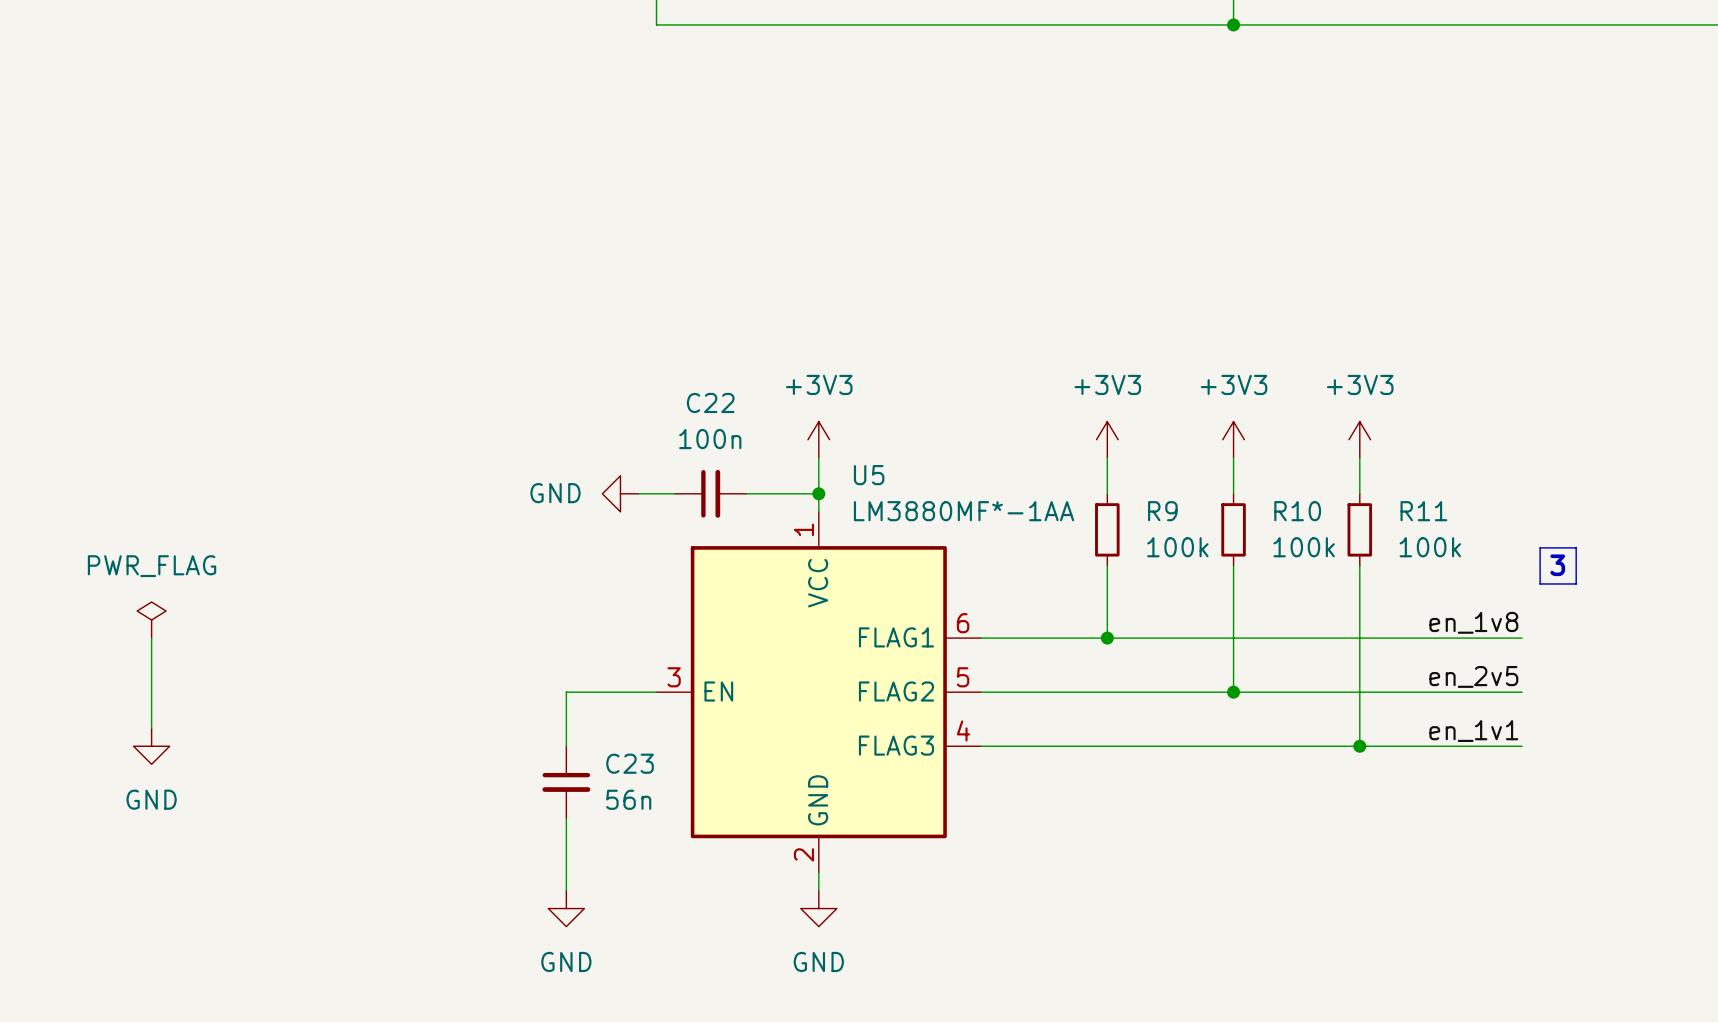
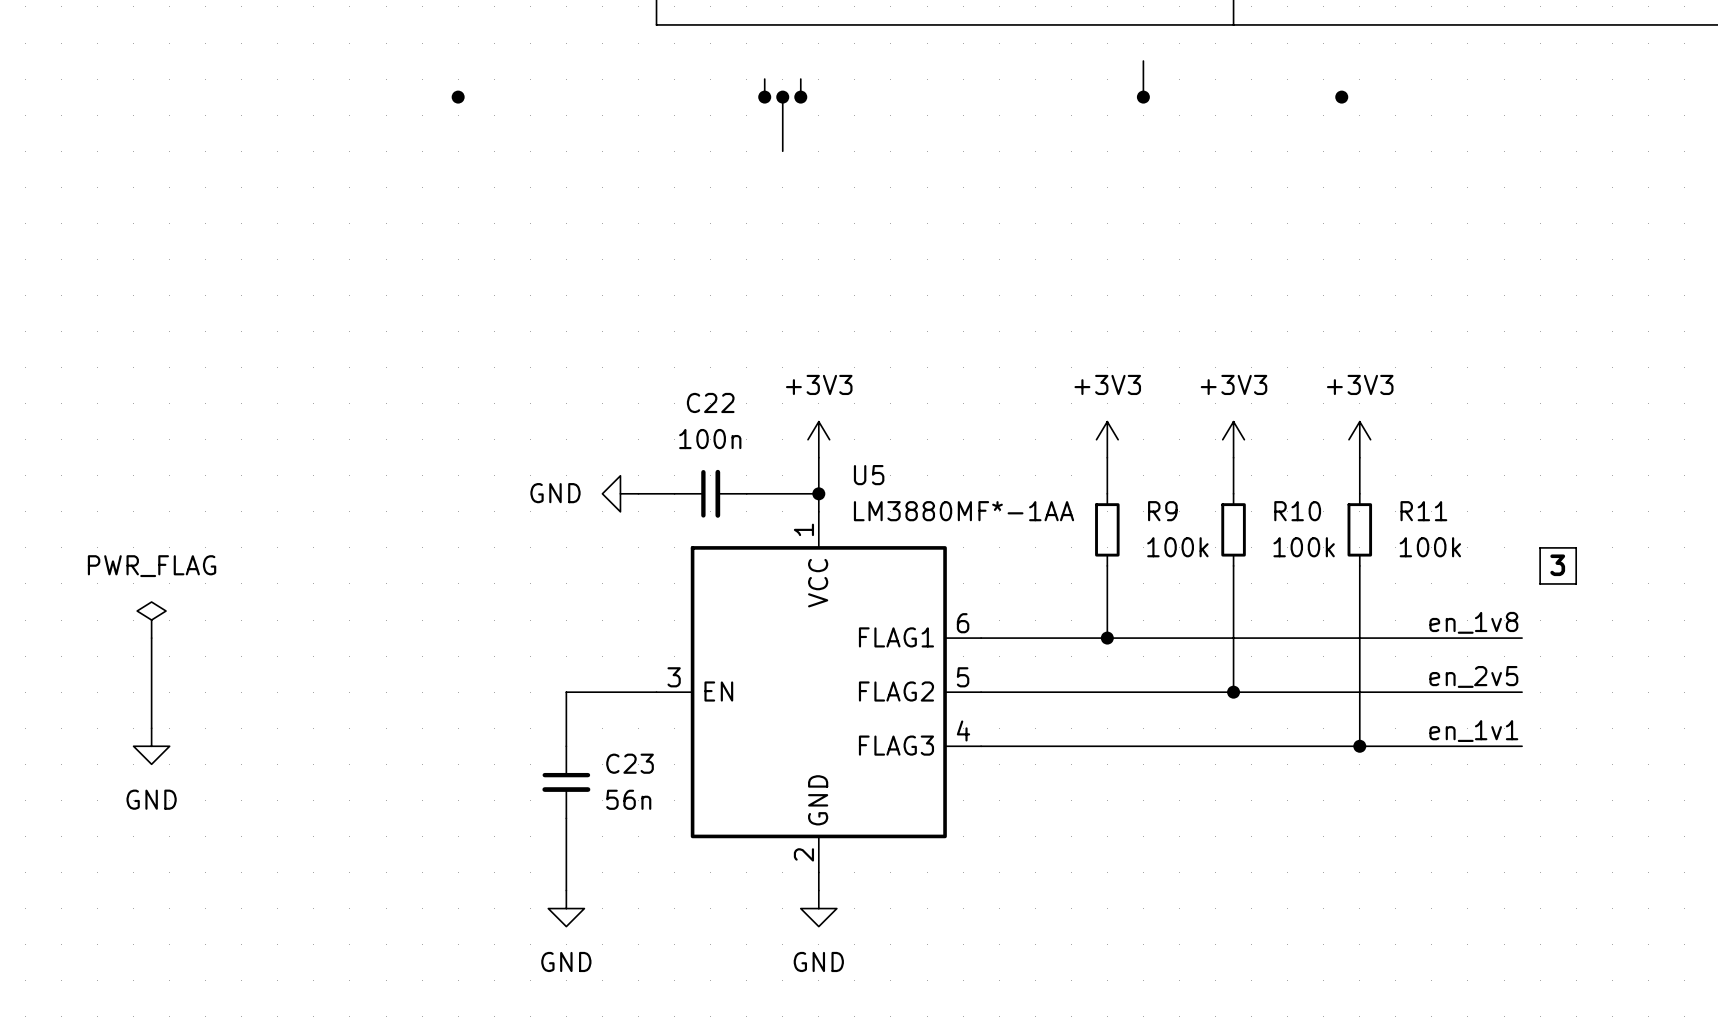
junction: (1233, 24) -> none
wire: none -> (1143, 61) (1143, 97)
wire: none -> (764, 79) (764, 97)
wire: none -> (800, 79) (800, 97)
junction: none -> (458, 97)
junction: none -> (764, 97)
wire: none -> (782, 97) (782, 151)
junction: none -> (782, 97)
junction: none -> (800, 97)
junction: none -> (1143, 97)
junction: none -> (1341, 97)

